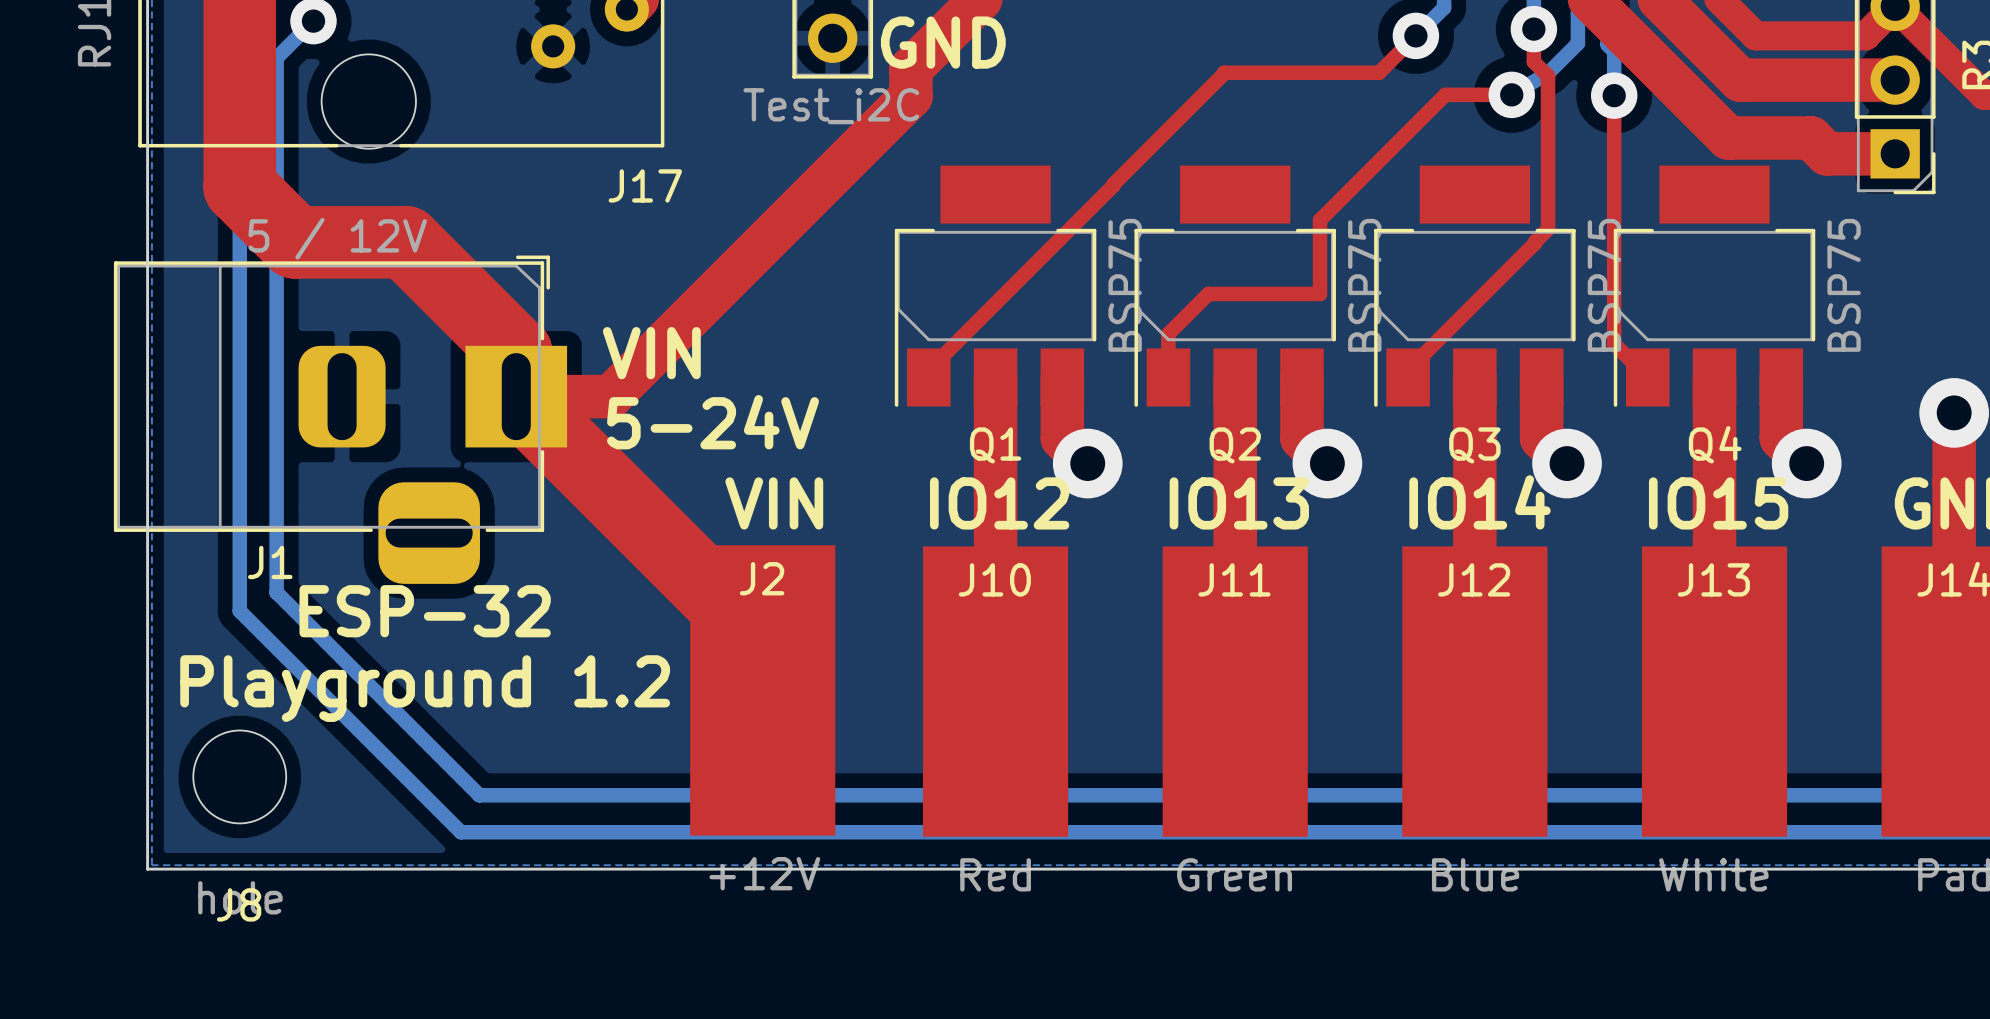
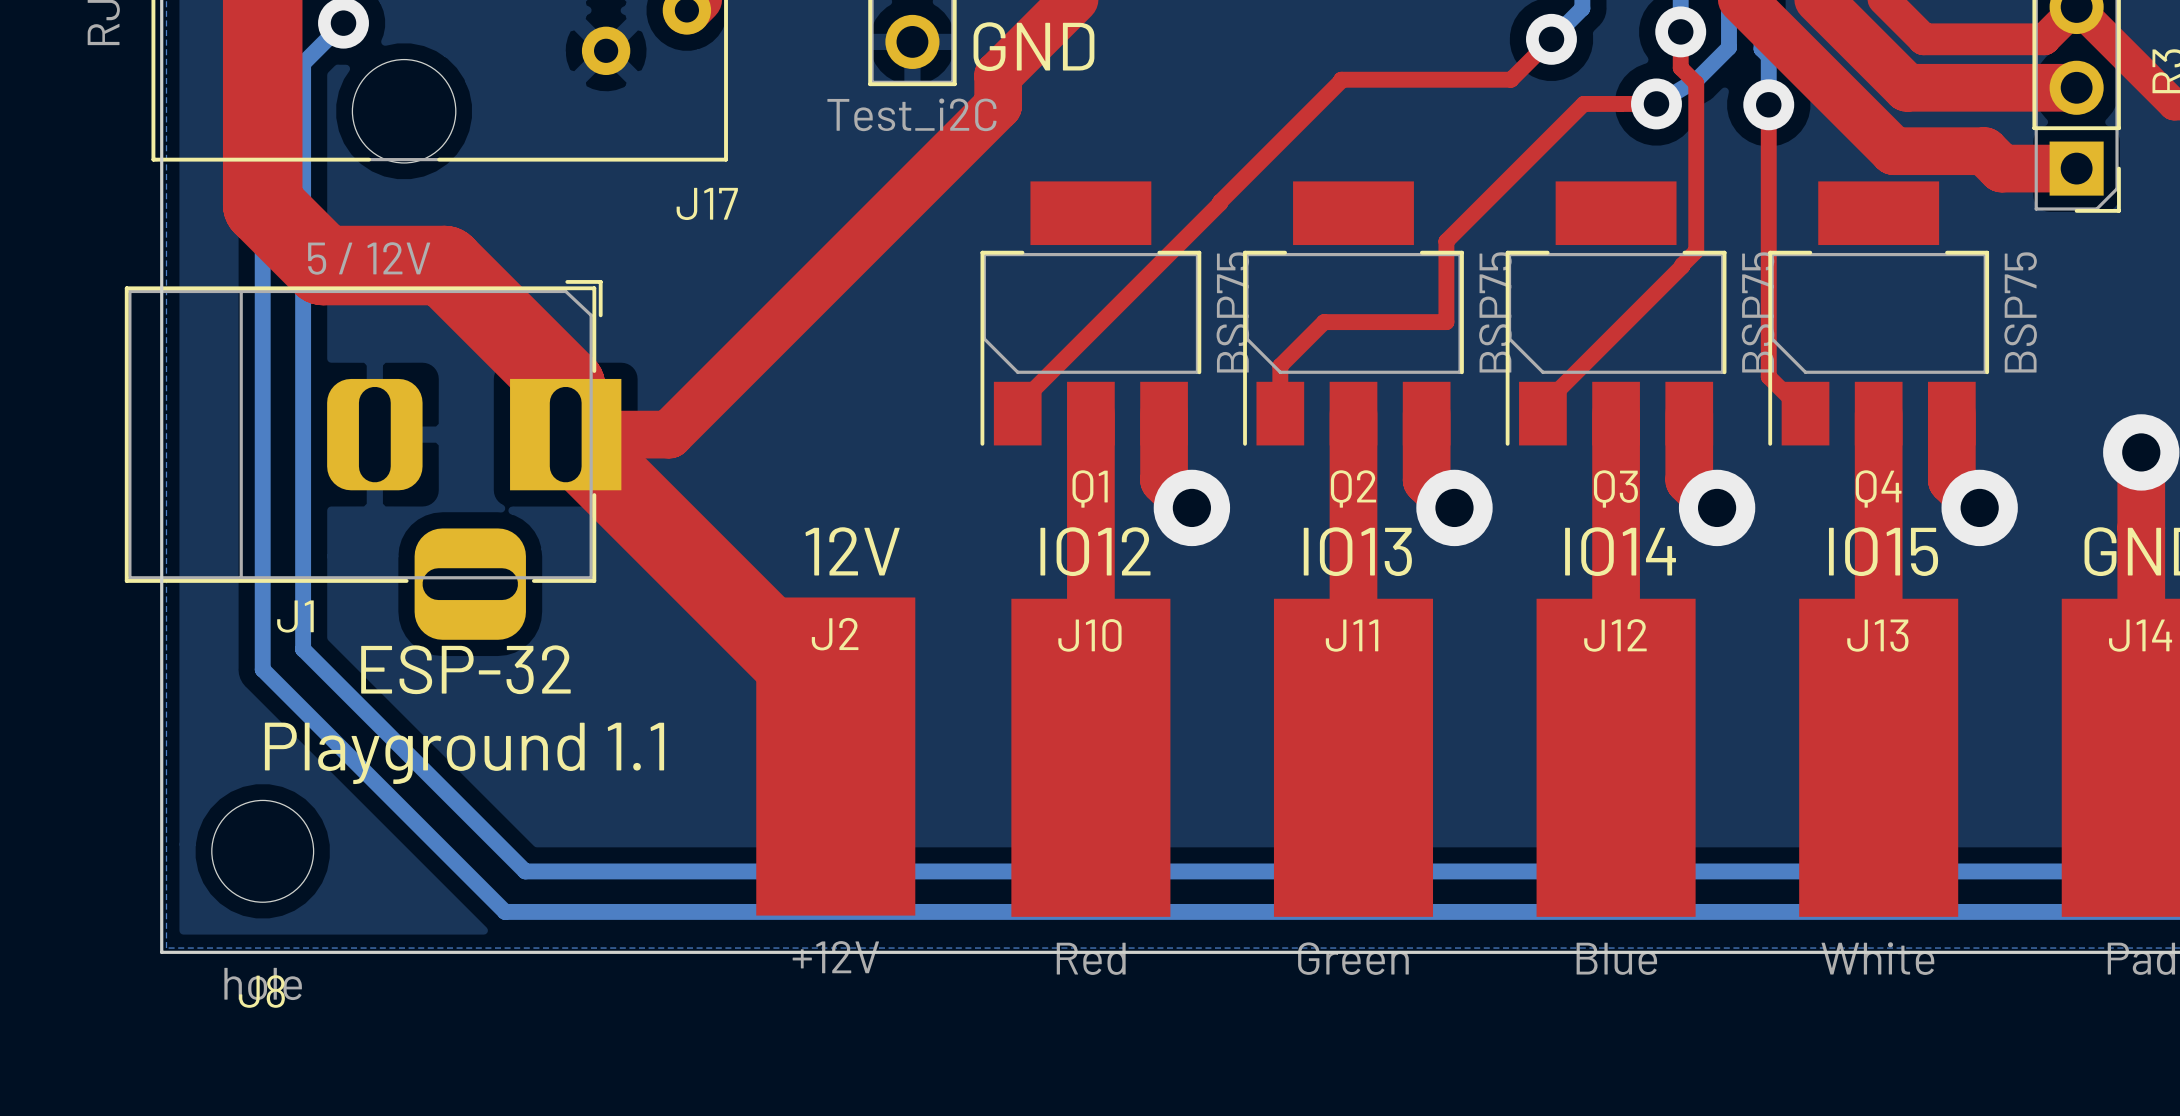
text: VIN (651, 353) -> none
text: 5-24V (713, 422) -> none
text: VIN (774, 503) -> 12V (852, 551)
text: Playground 1.2 (425, 688) -> Playground 1.1 (464, 753)

